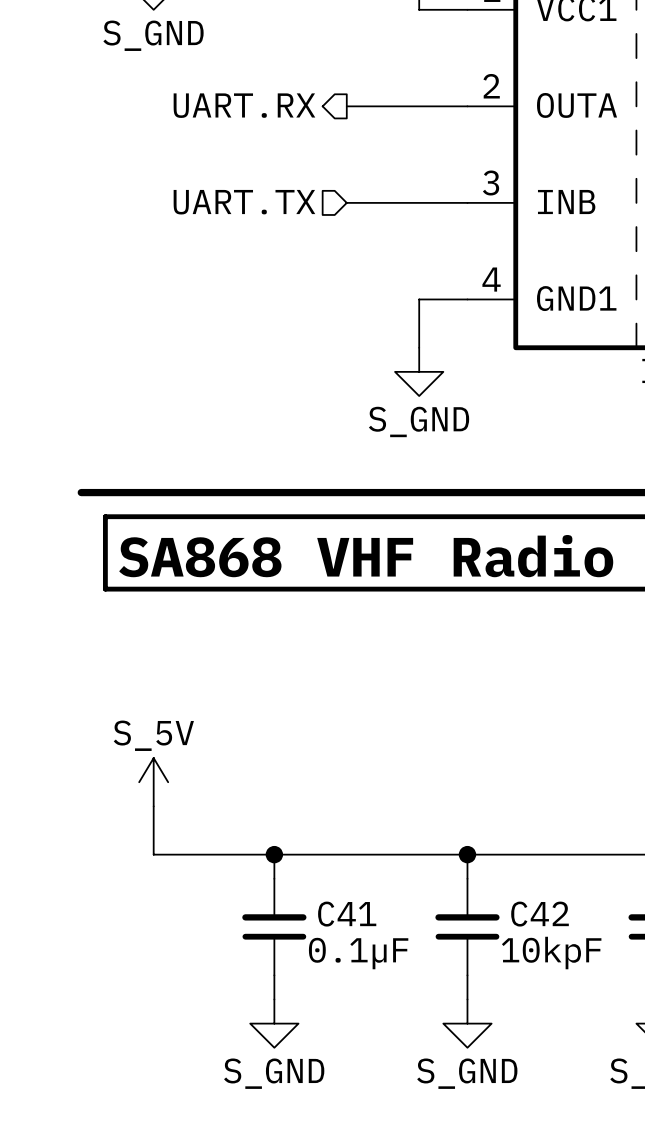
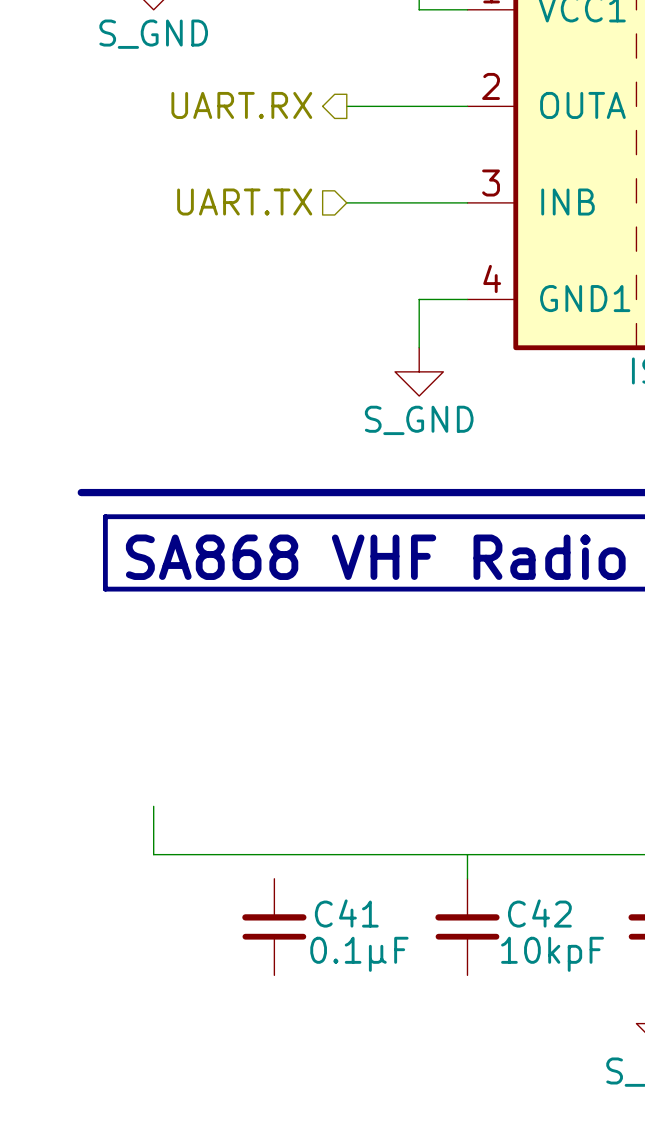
power symbol: S_5V (153, 782) -> none
wire: (274, 854) (274, 878) -> none
junction: (274, 854) -> none
junction: (467, 854) -> none
wire: (274, 975) (274, 999) -> none
wire: (467, 975) (467, 999) -> none
power symbol: S_GND (274, 1023) -> none
power symbol: S_GND (467, 1023) -> none

